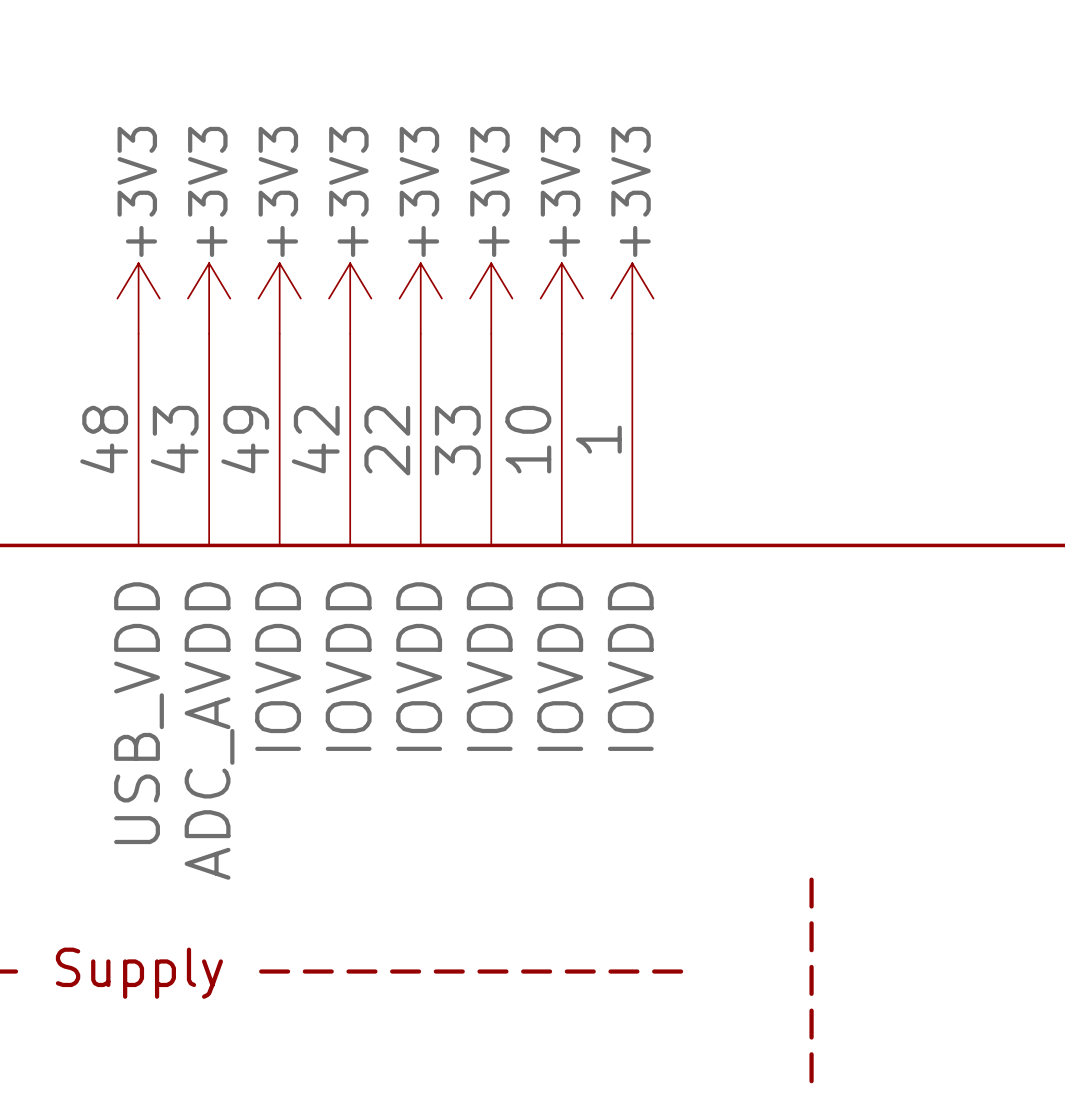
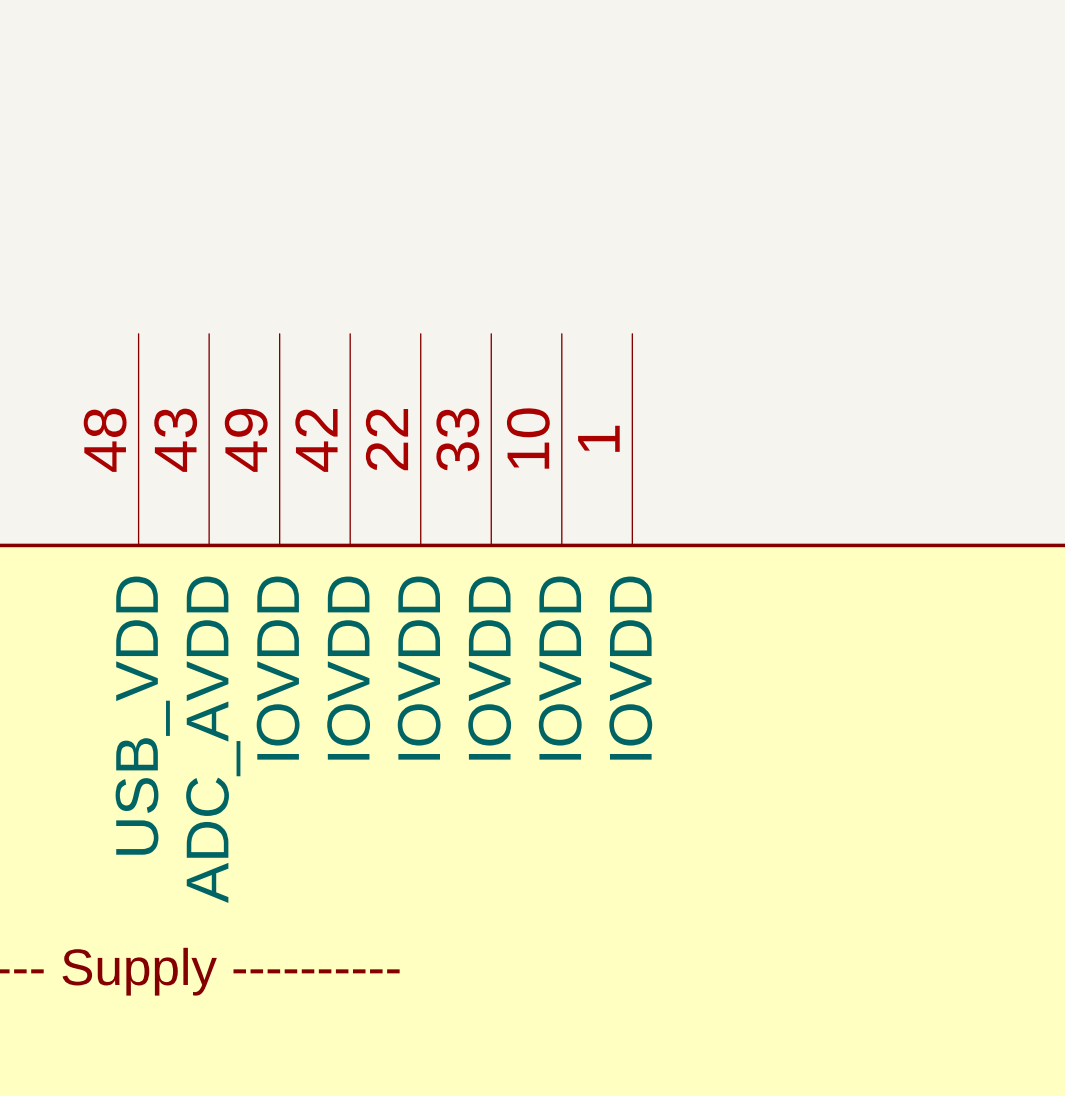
power symbol: +3V3 (138, 298) -> none
power symbol: +3V3 (209, 298) -> none
power symbol: +3V3 (279, 298) -> none
power symbol: +3V3 (350, 298) -> none
power symbol: +3V3 (420, 298) -> none
power symbol: +3V3 (491, 298) -> none
power symbol: +3V3 (561, 298) -> none
power symbol: +3V3 (632, 298) -> none

